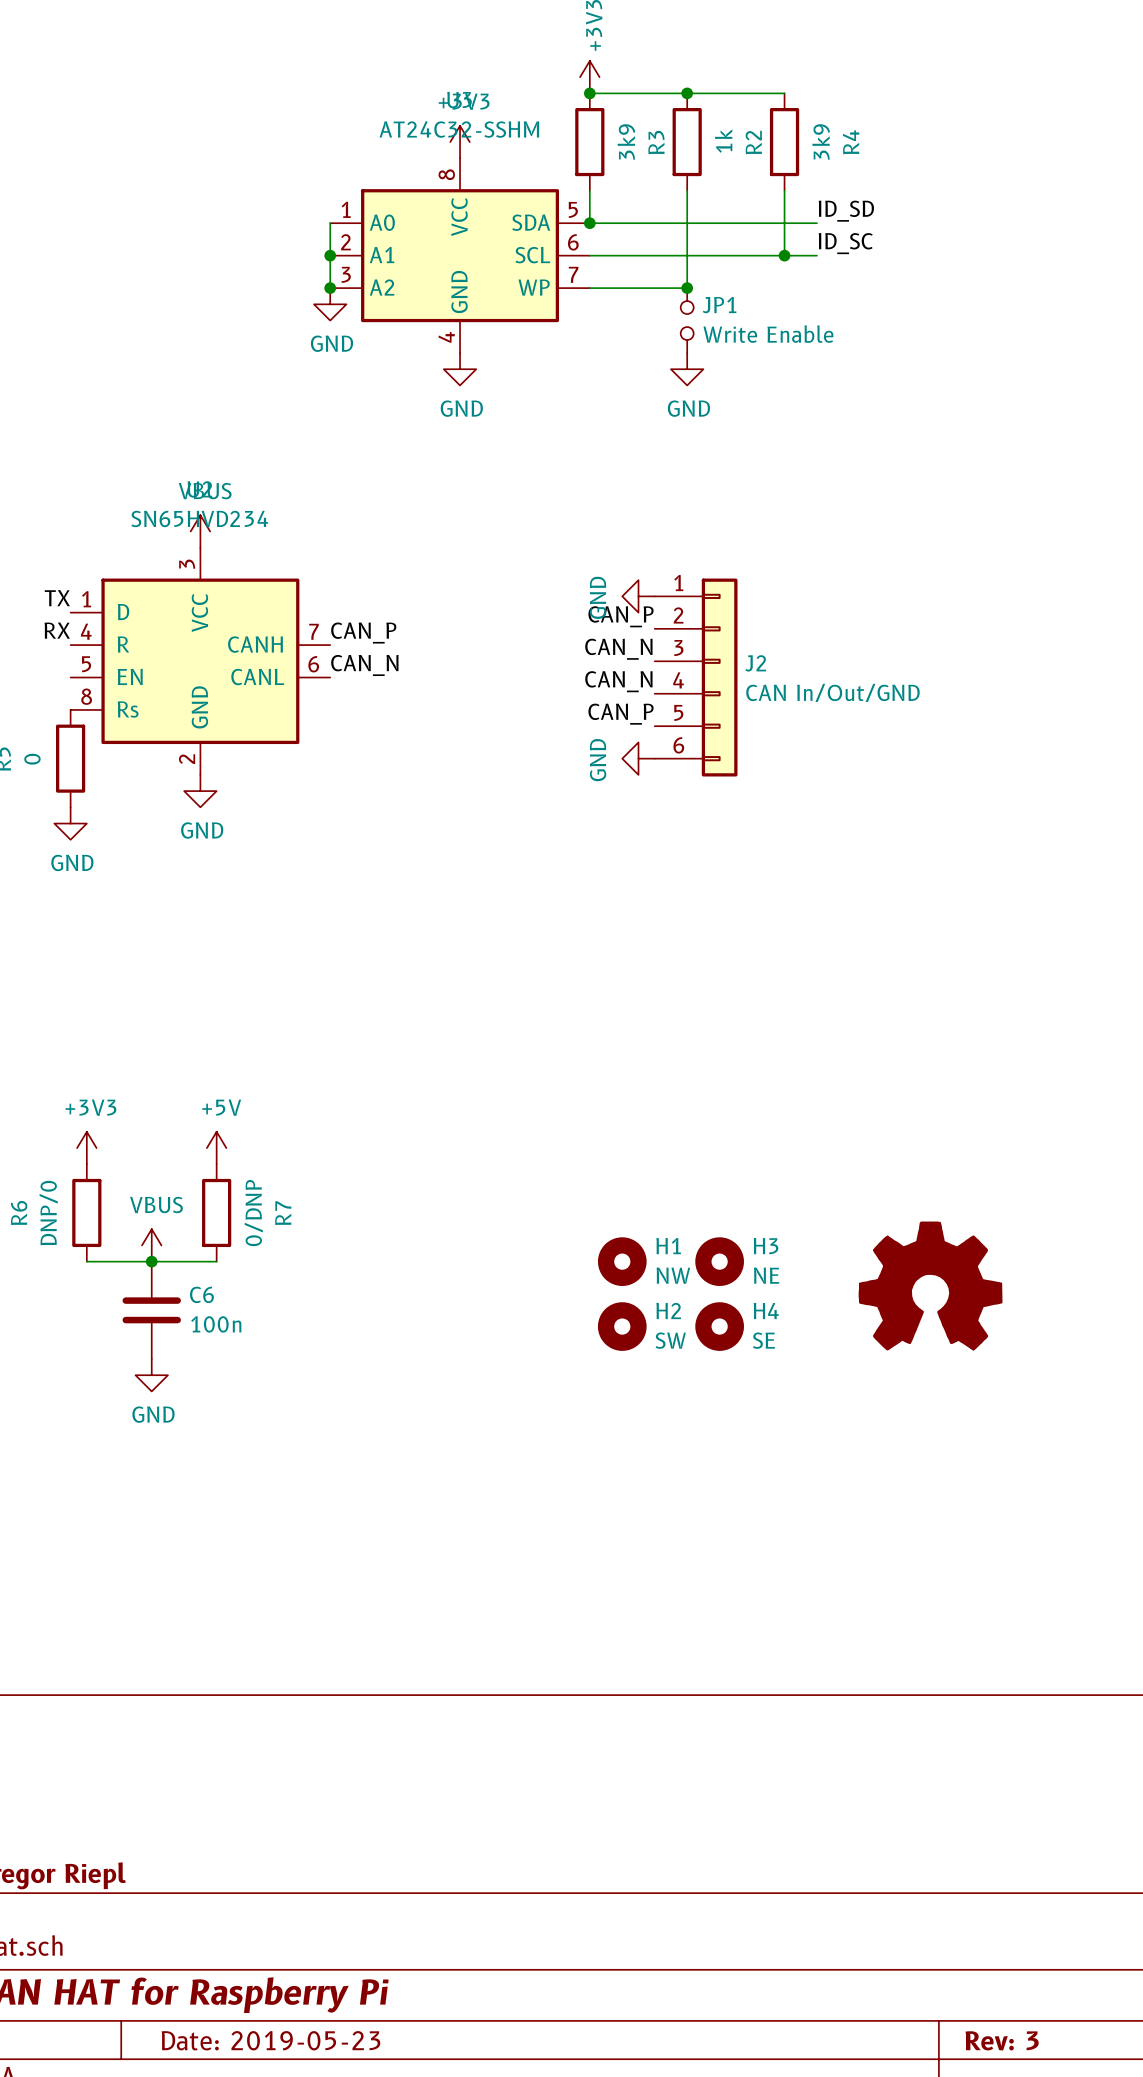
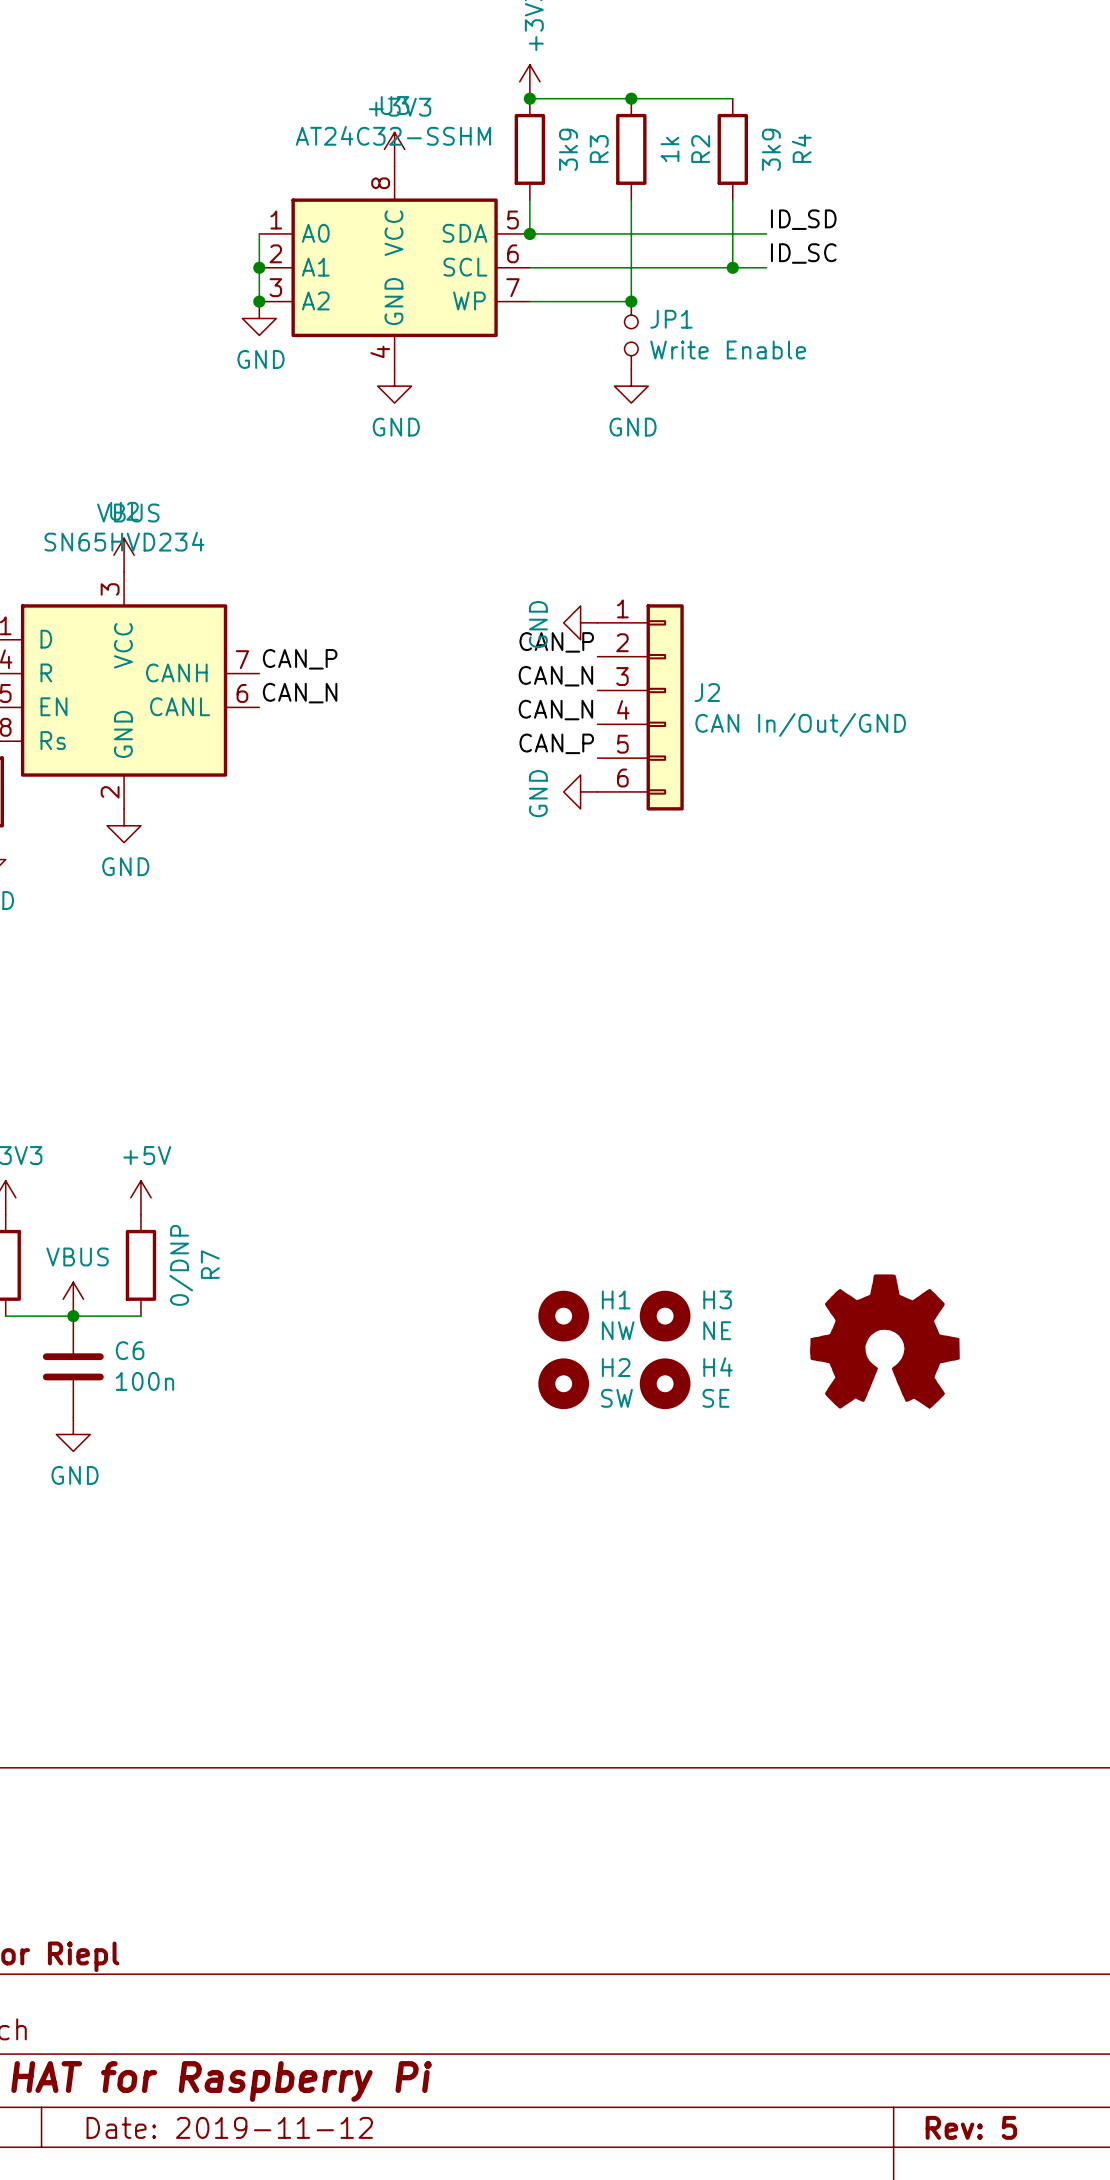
title block: Date: 2019-05-23 (271, 2040) -> Date: 2019-11-12 (229, 2127)
title block: Rev: 3 (1002, 2040) -> Rev: 5 (971, 2127)

